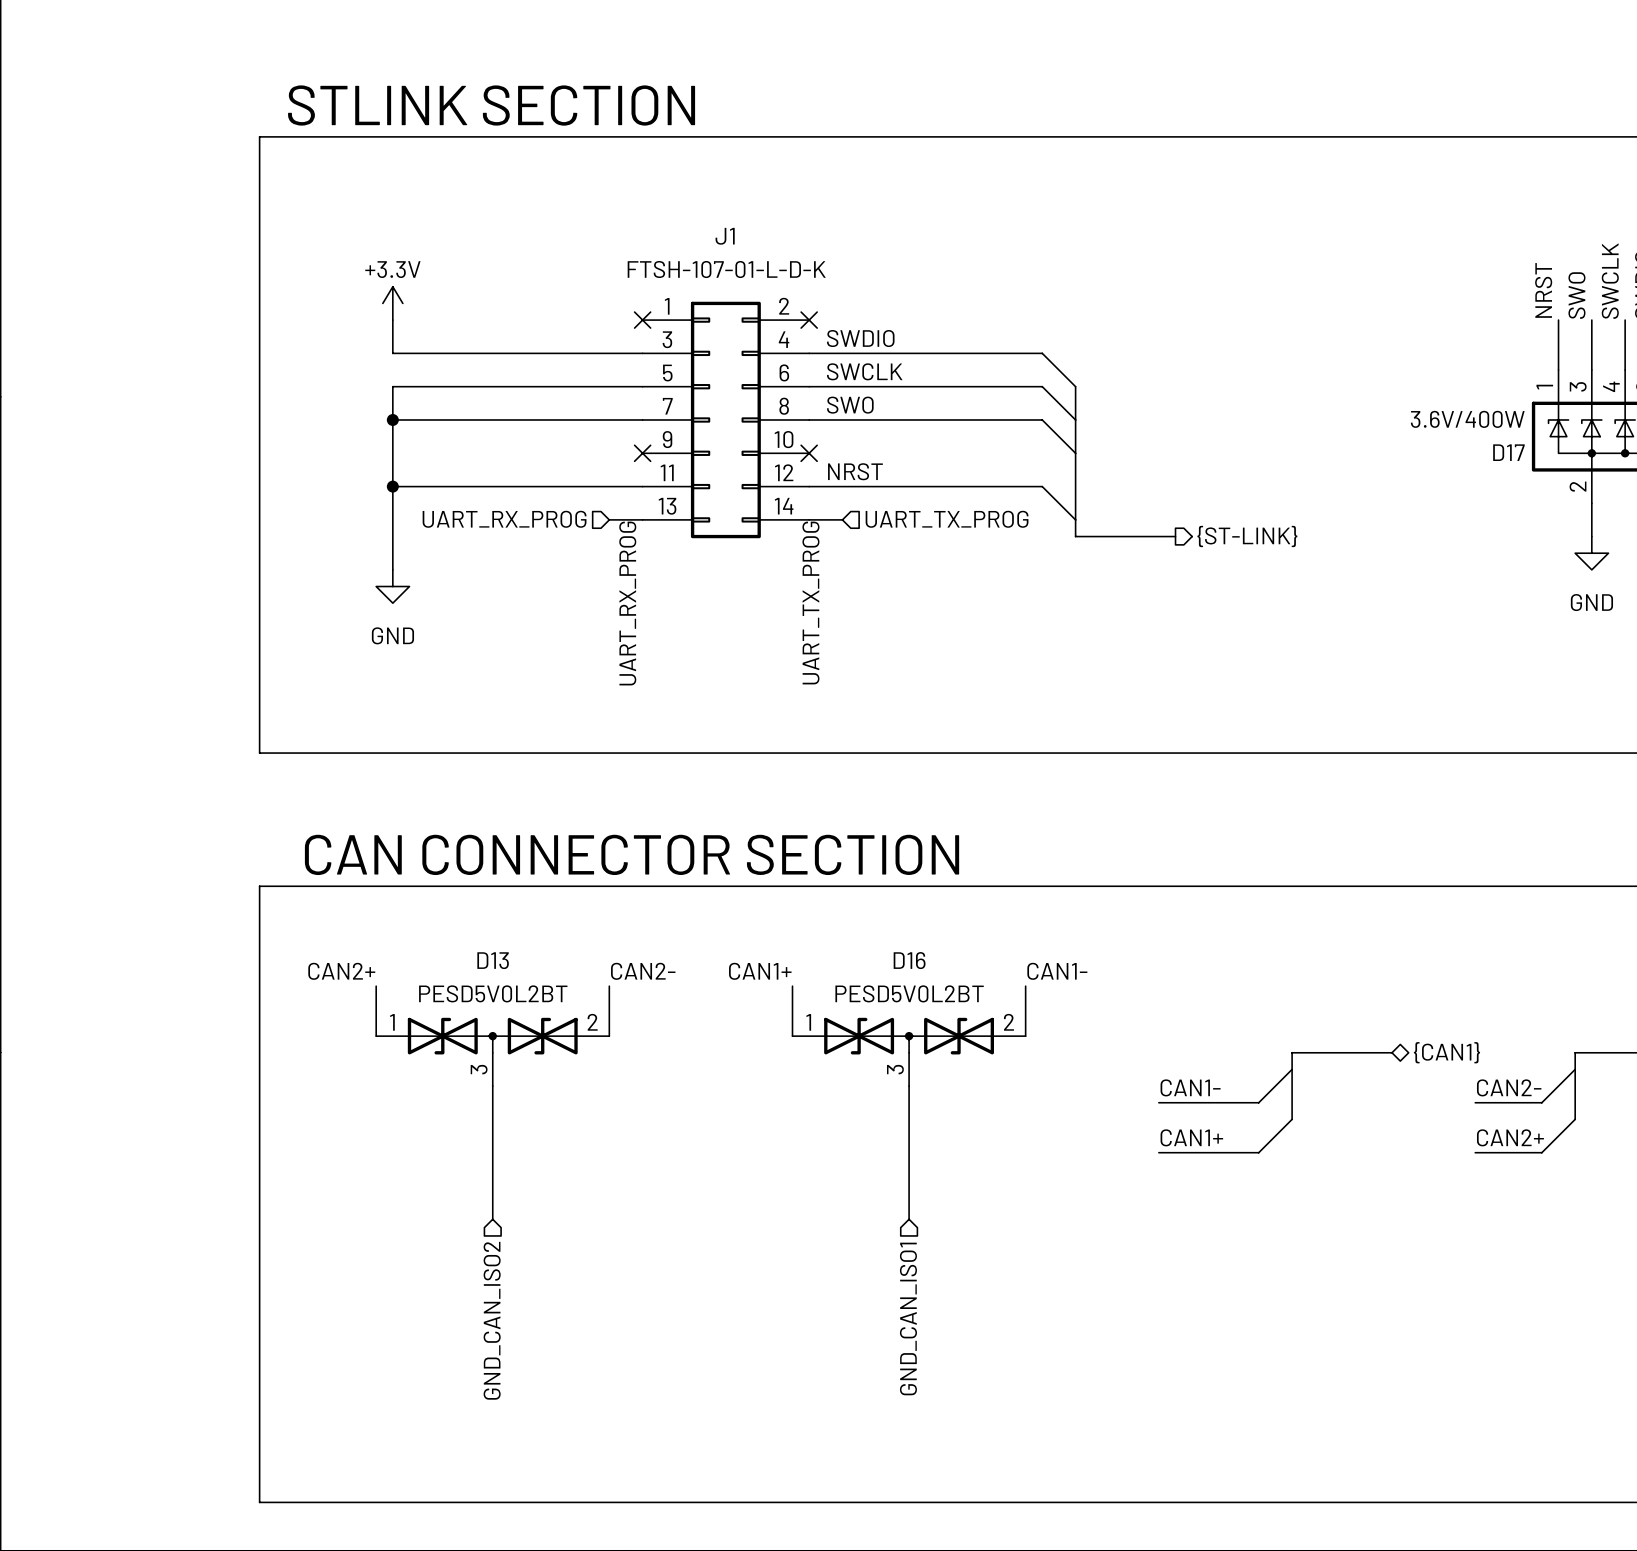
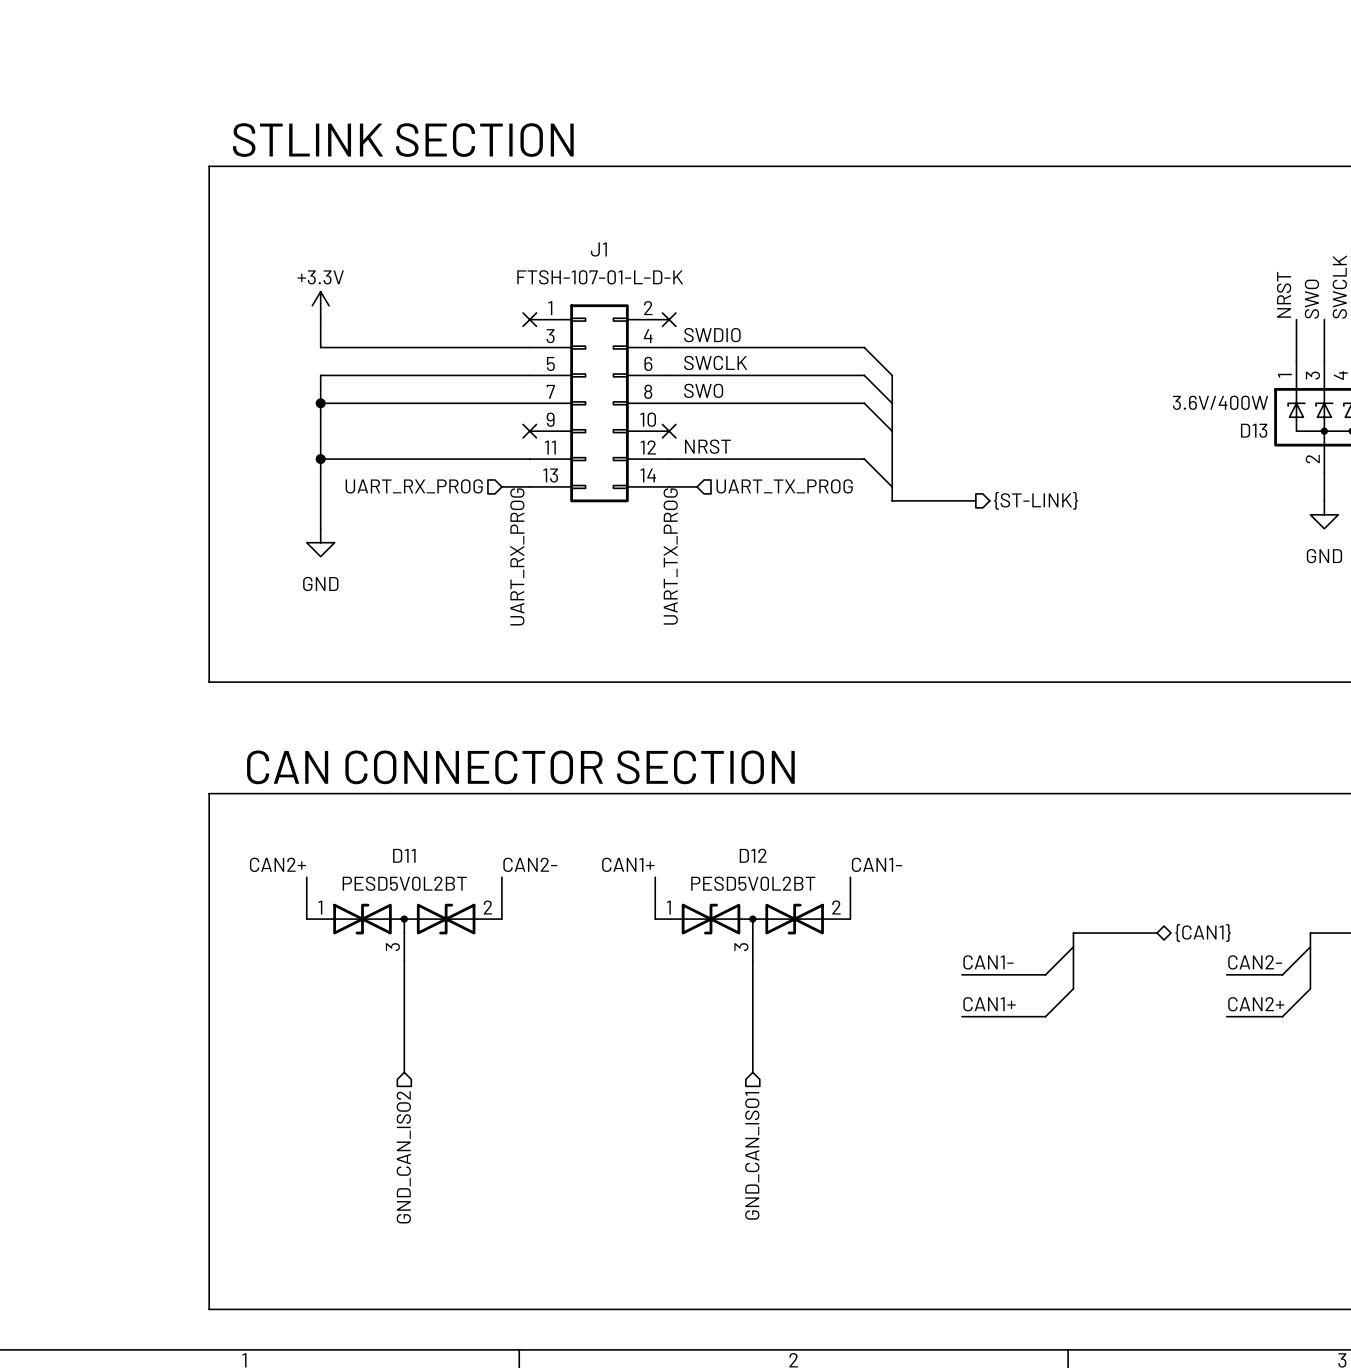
D17 name: D17 (1508, 452) -> D13 (1254, 430)
D13 name: D13 (493, 960) -> D11 (404, 855)
D16 name: D16 (909, 960) -> D12 (753, 855)

